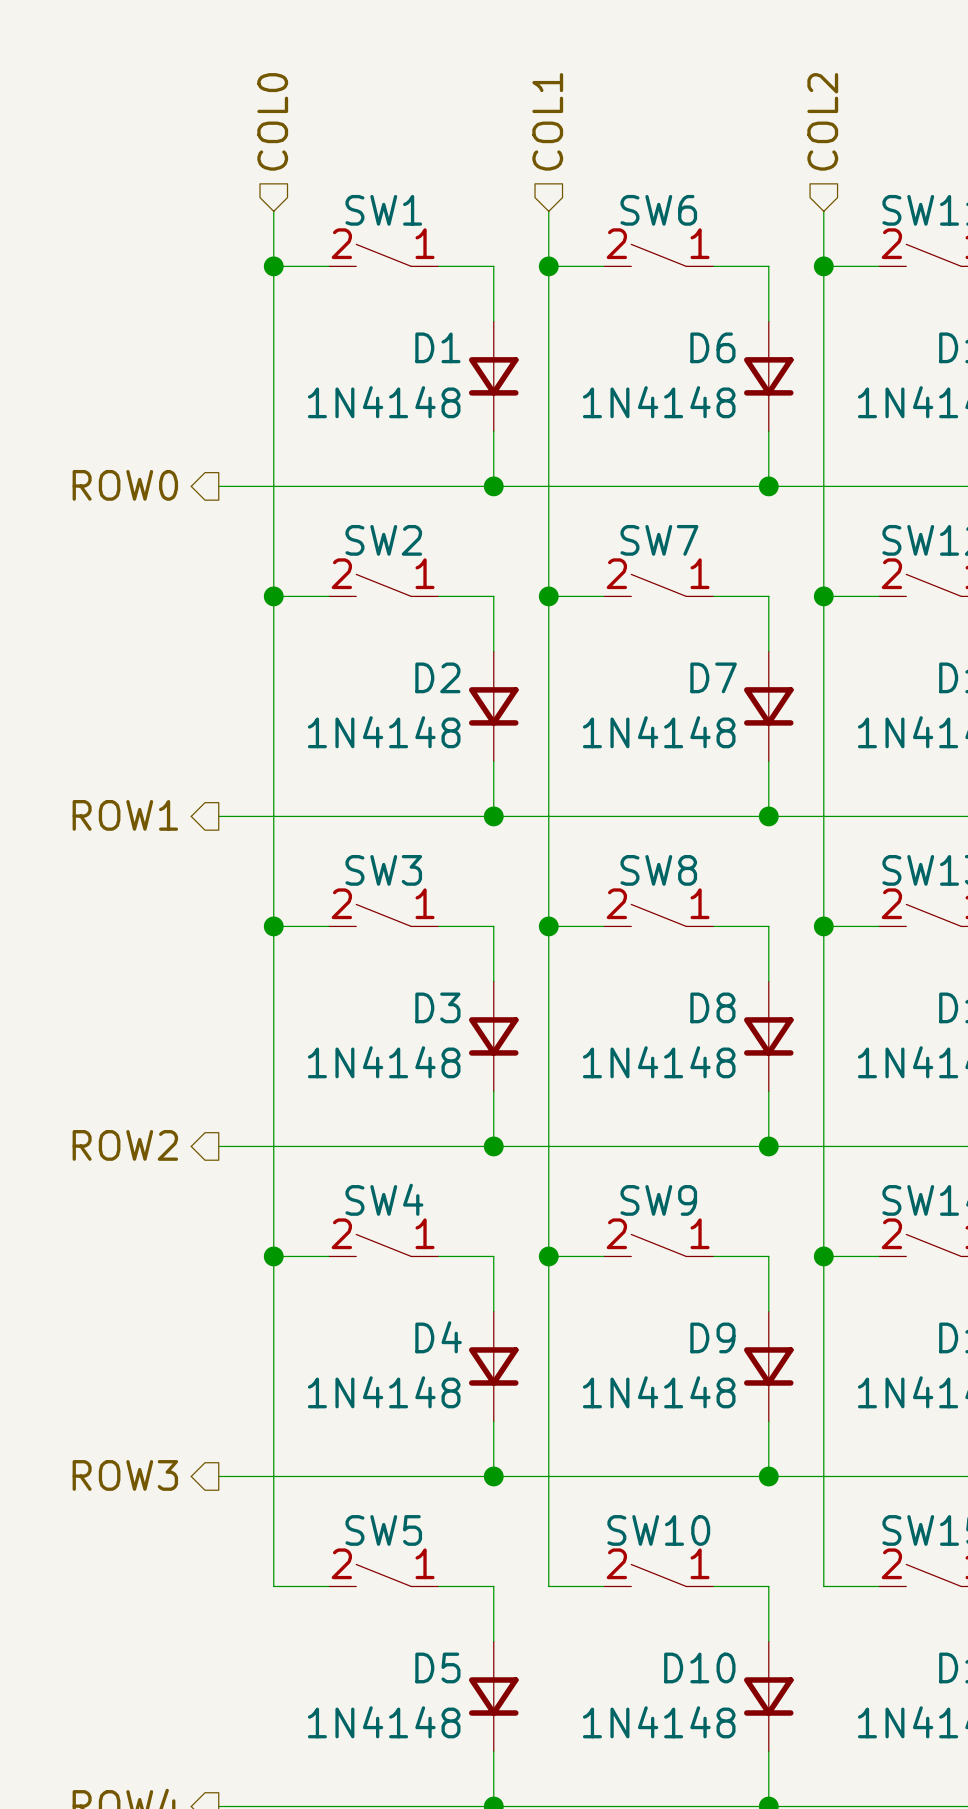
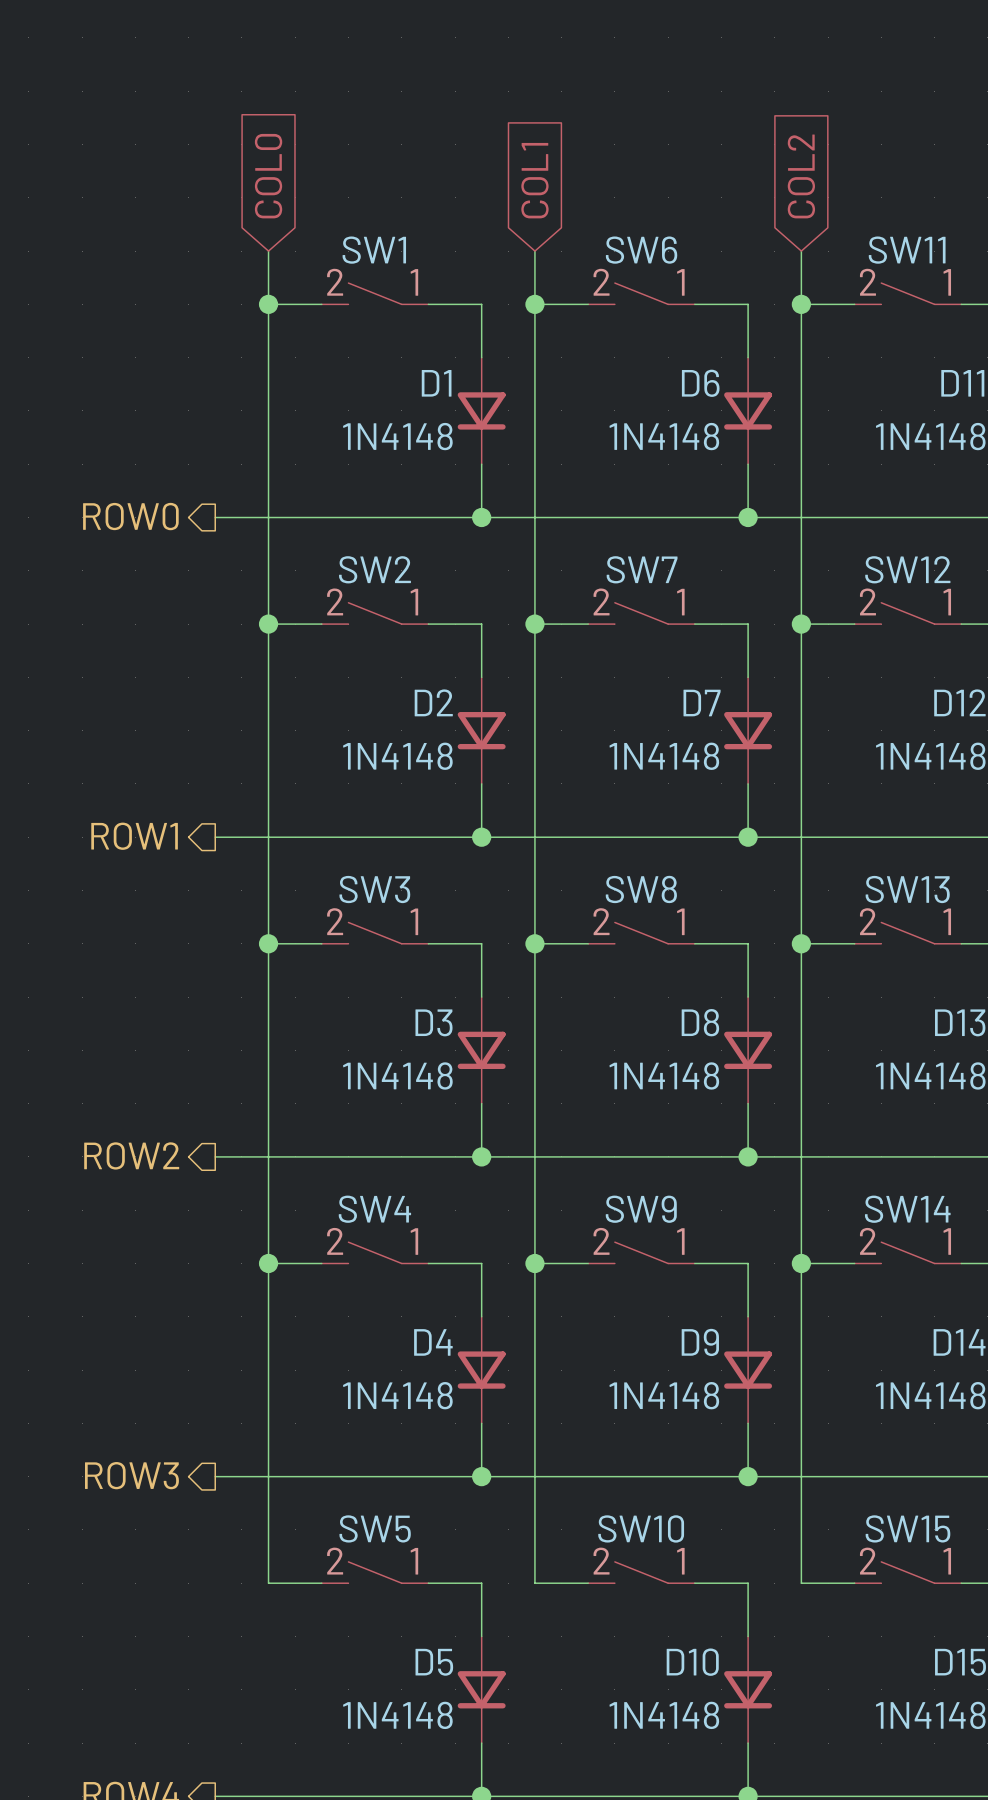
hierarchical label: COL0 (272, 121) -> none
hierarchical label: COL1 (547, 121) -> none
hierarchical label: COL2 (822, 121) -> none
global label: none -> COL0 (268, 176)
global label: none -> COL1 (534, 180)
global label: none -> COL2 (801, 176)

